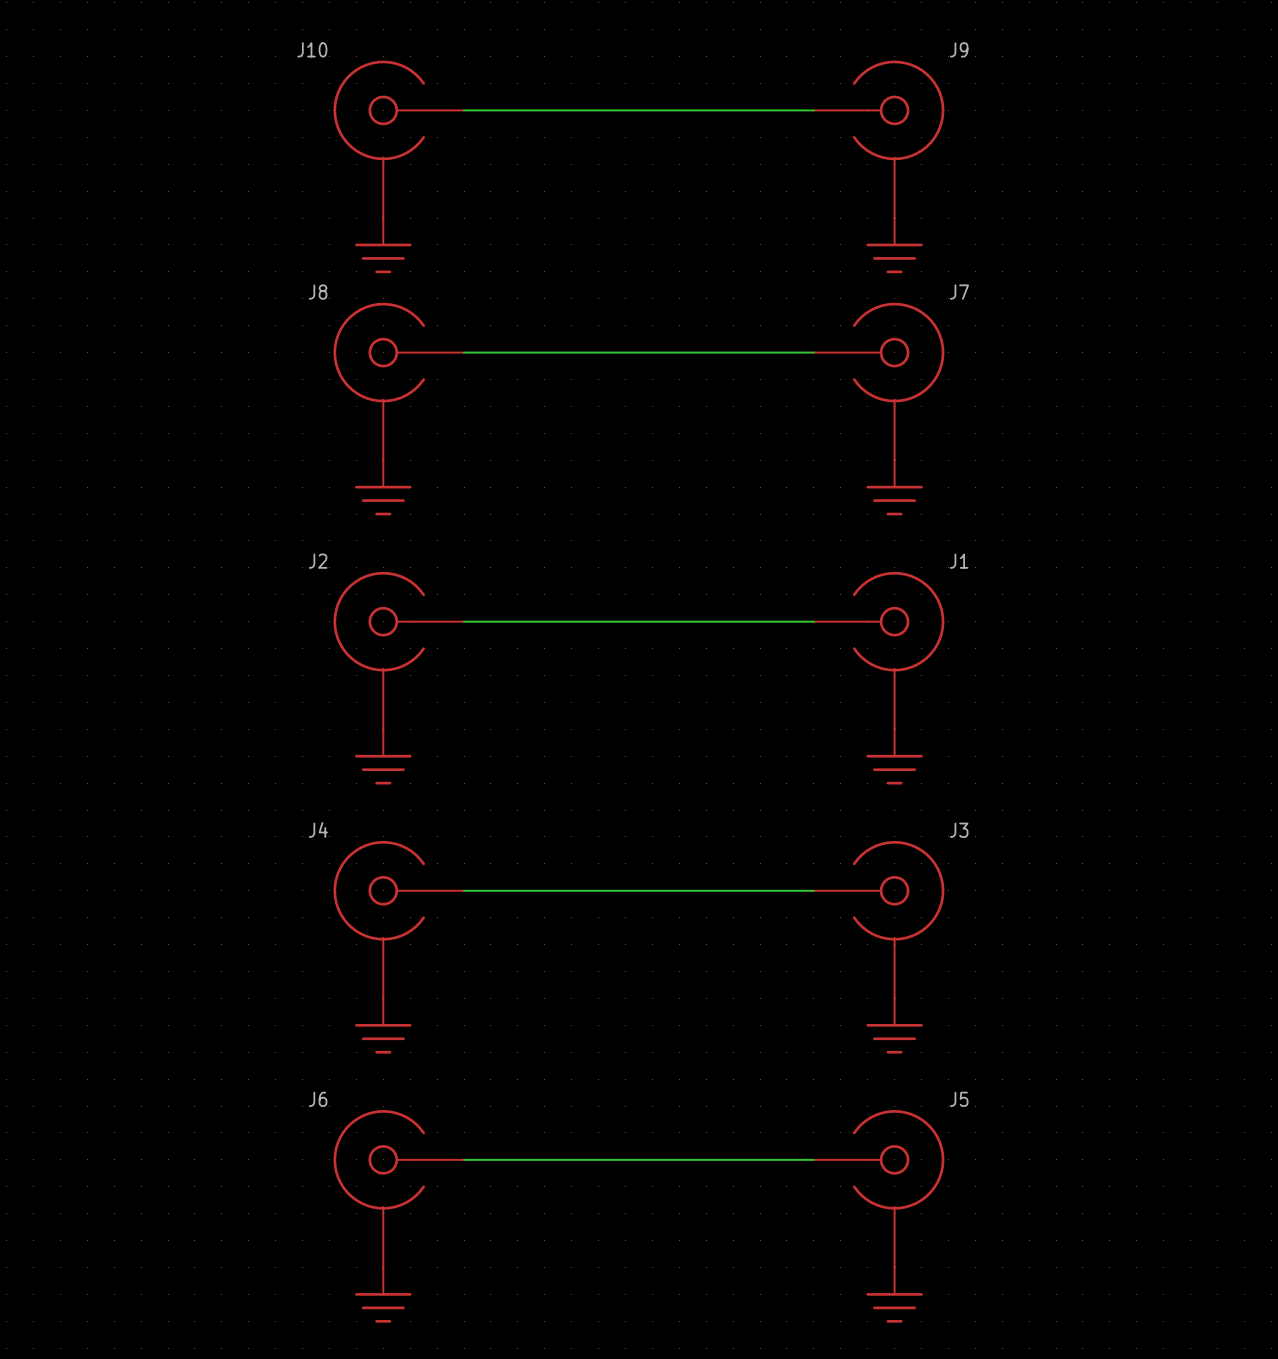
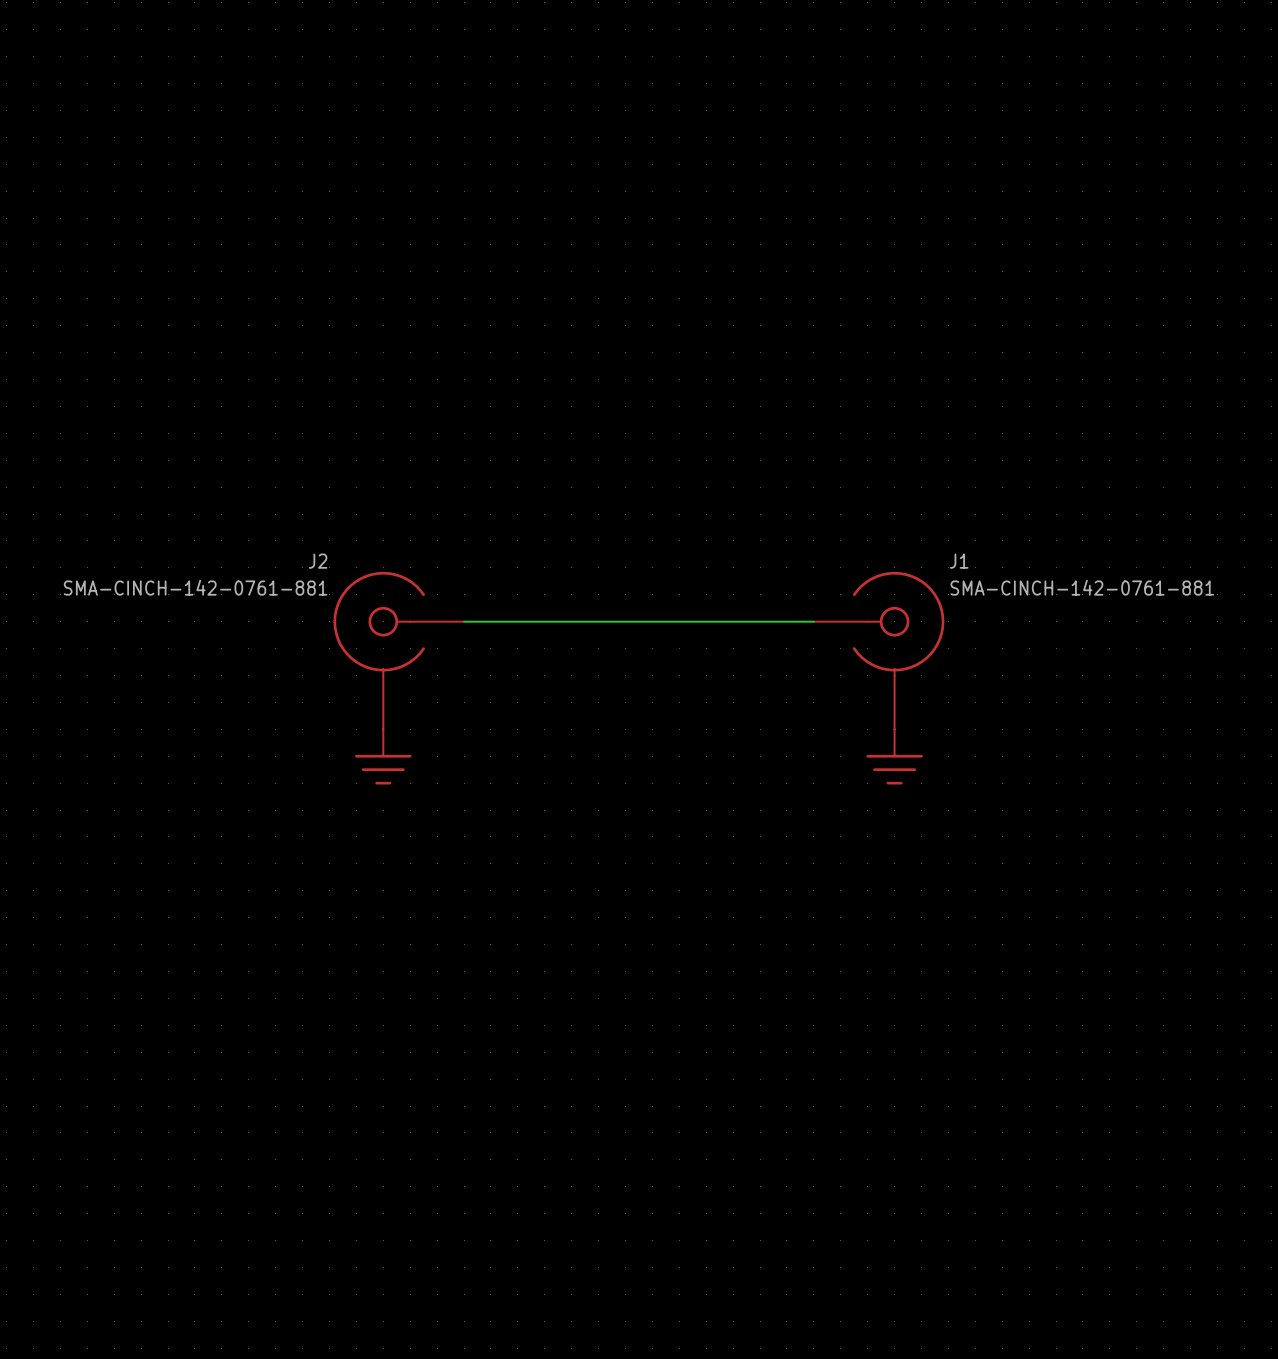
wire: (464, 110) (813, 110) -> none
J10: (398, 139) -> none
J9: (879, 139) -> none
power symbol: (383, 245) -> none
power symbol: (894, 245) -> none
wire: (464, 352) (813, 352) -> none
J8: (398, 381) -> none
J7: (879, 381) -> none
power symbol: (383, 487) -> none
power symbol: (894, 487) -> none
J2 value: none -> SMA-CINCH-142-0761-881 (195, 587)
J1 value: none -> SMA-CINCH-142-0761-881 (1082, 587)
wire: (464, 890) (813, 890) -> none
J4: (398, 919) -> none
J3: (879, 919) -> none
power symbol: (383, 1025) -> none
power symbol: (894, 1025) -> none
wire: (464, 1159) (813, 1159) -> none
J6: (398, 1188) -> none
J5: (879, 1188) -> none
power symbol: (383, 1295) -> none
power symbol: (894, 1295) -> none

